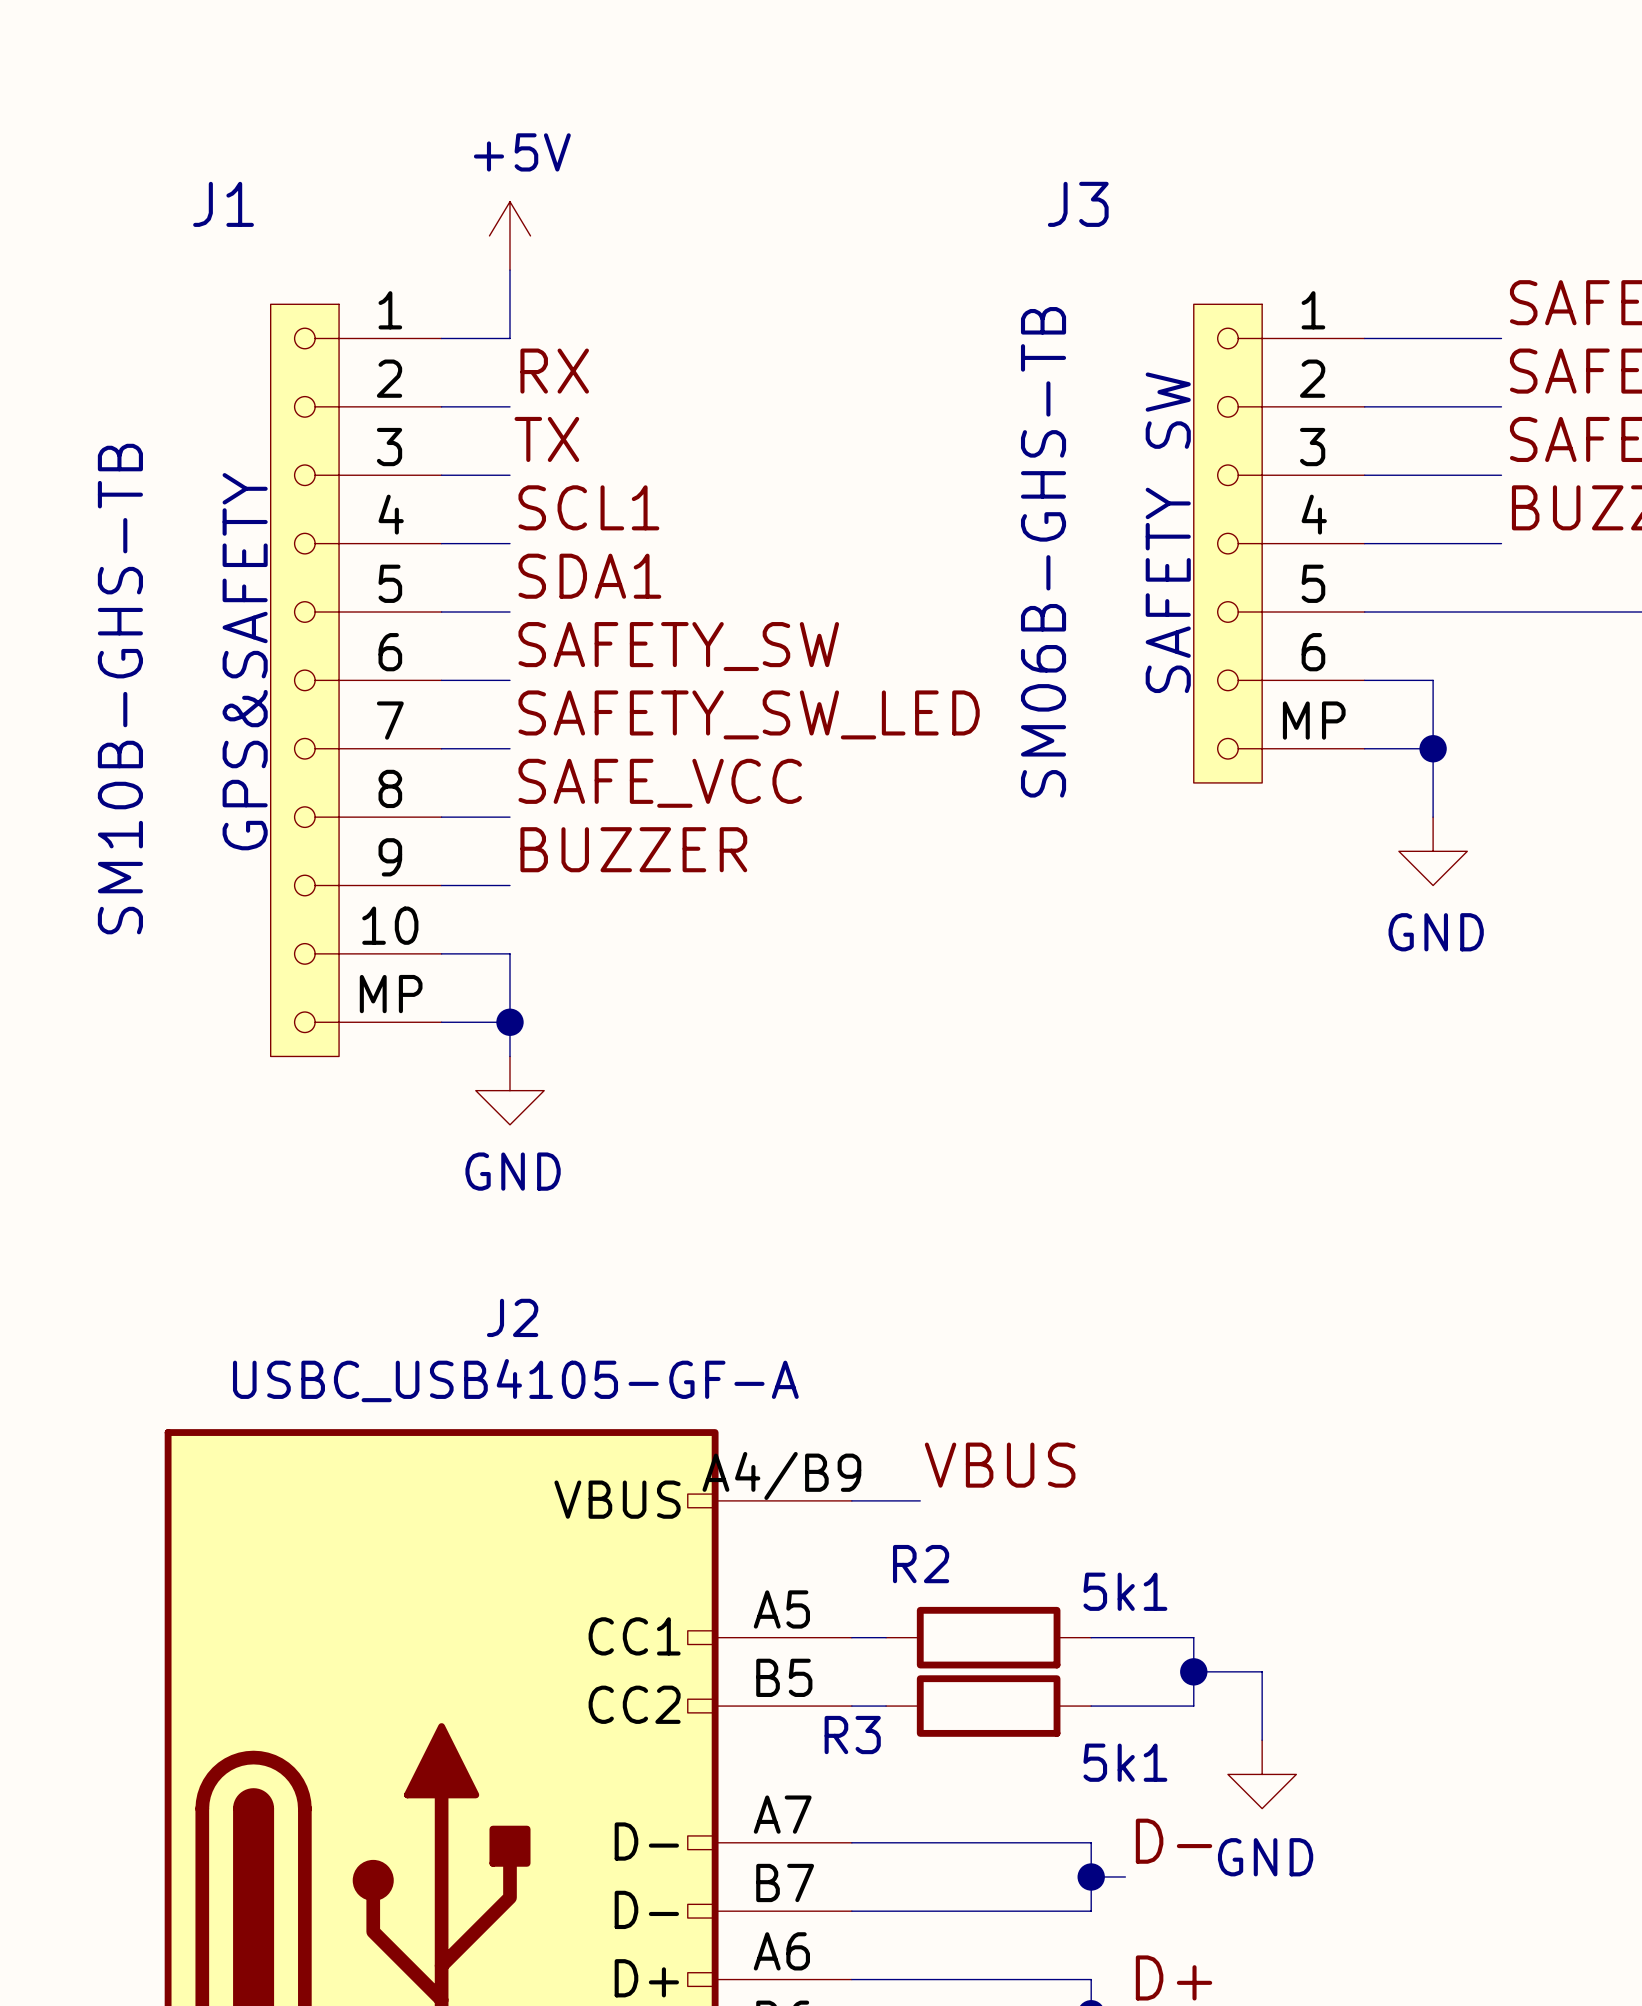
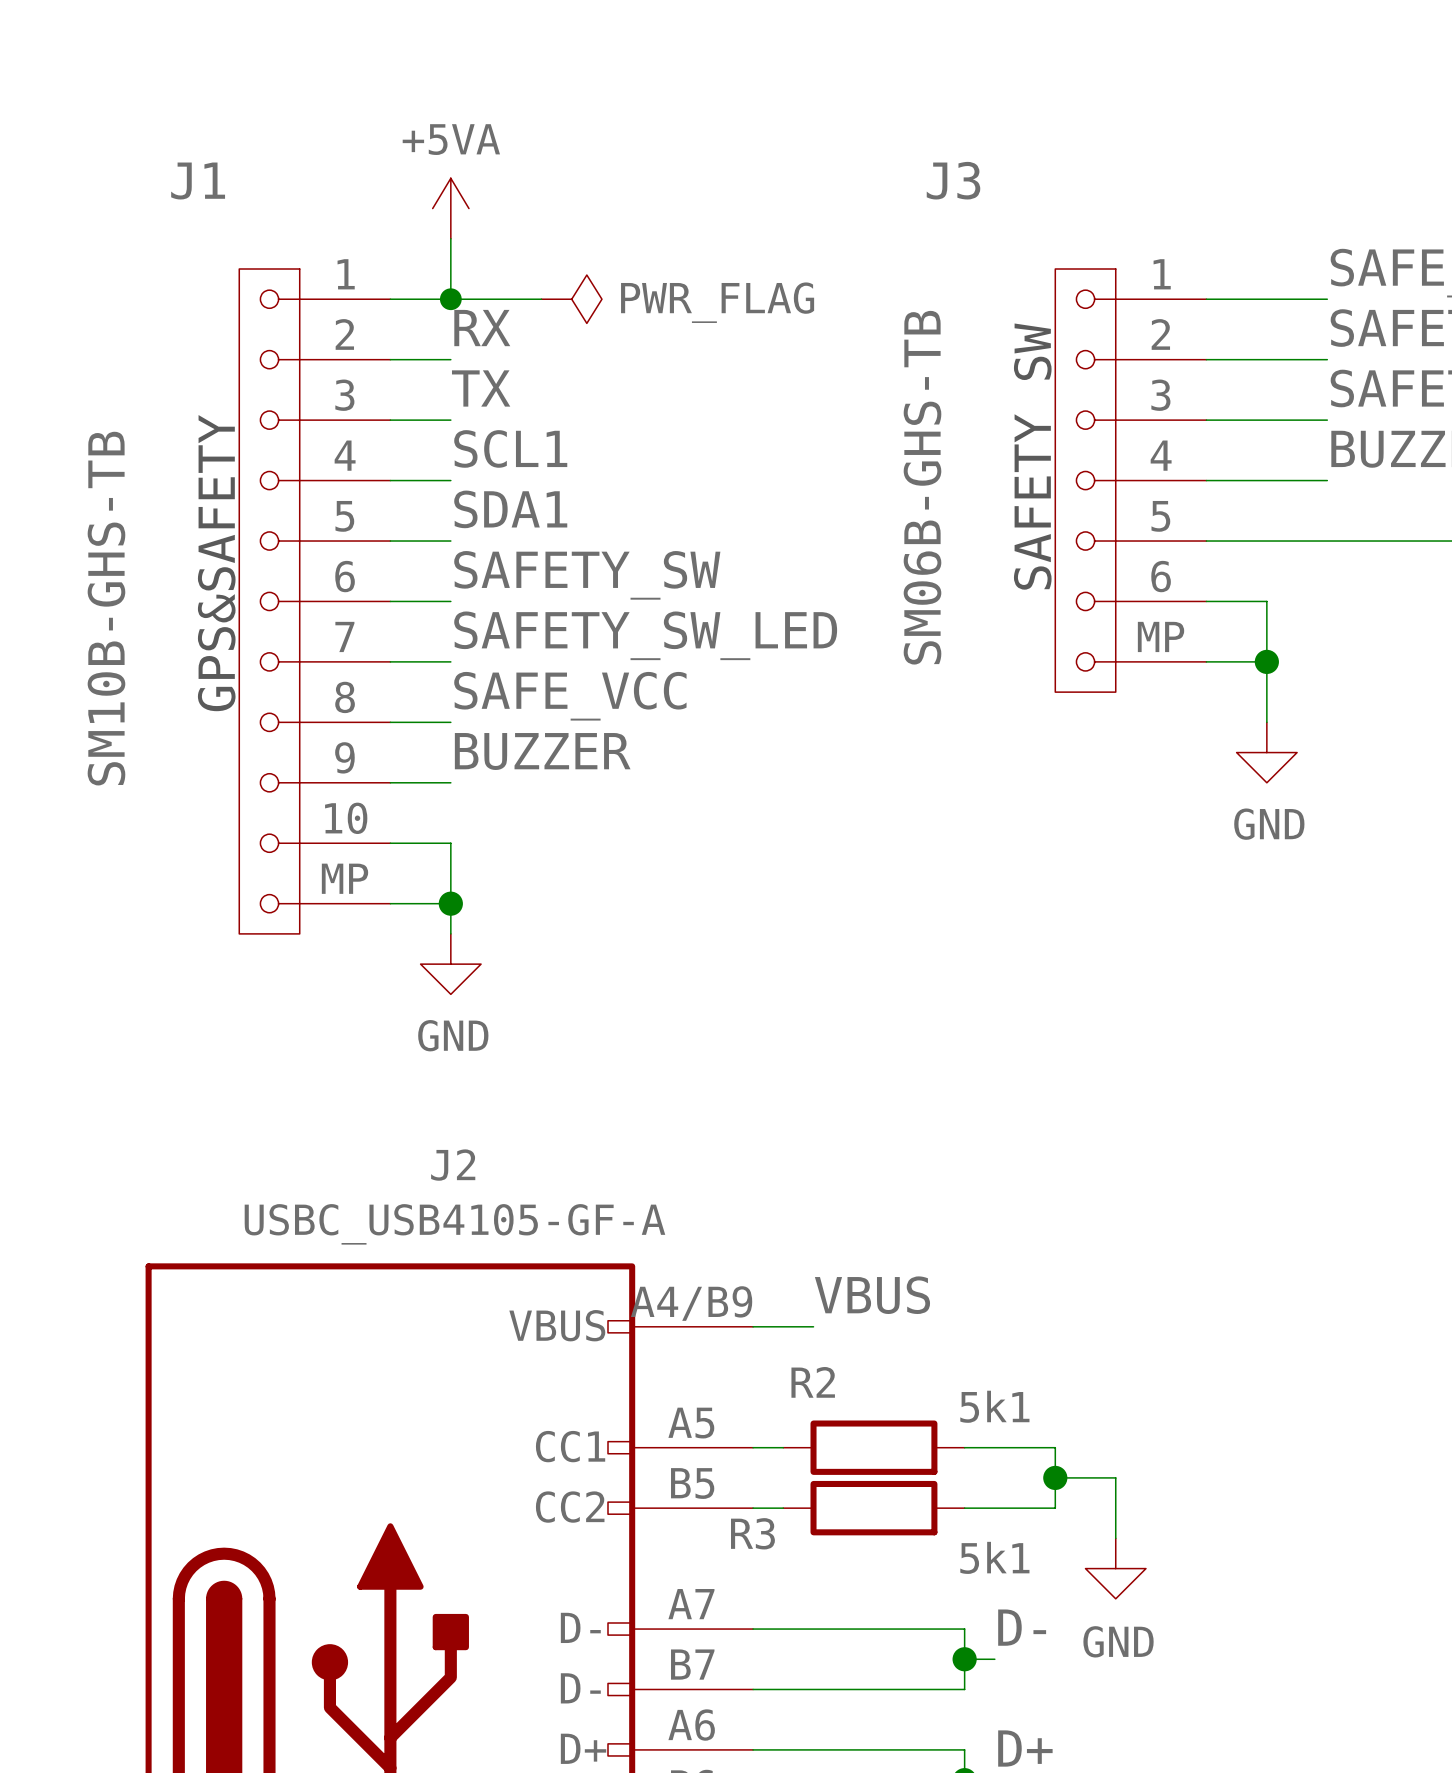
power symbol: +5V (509, 235) -> +5VA (450, 208)
wire: none -> (450, 299) (541, 299)
junction: none -> (450, 299)
power symbol: none -> PWR_FLAG (571, 299)

